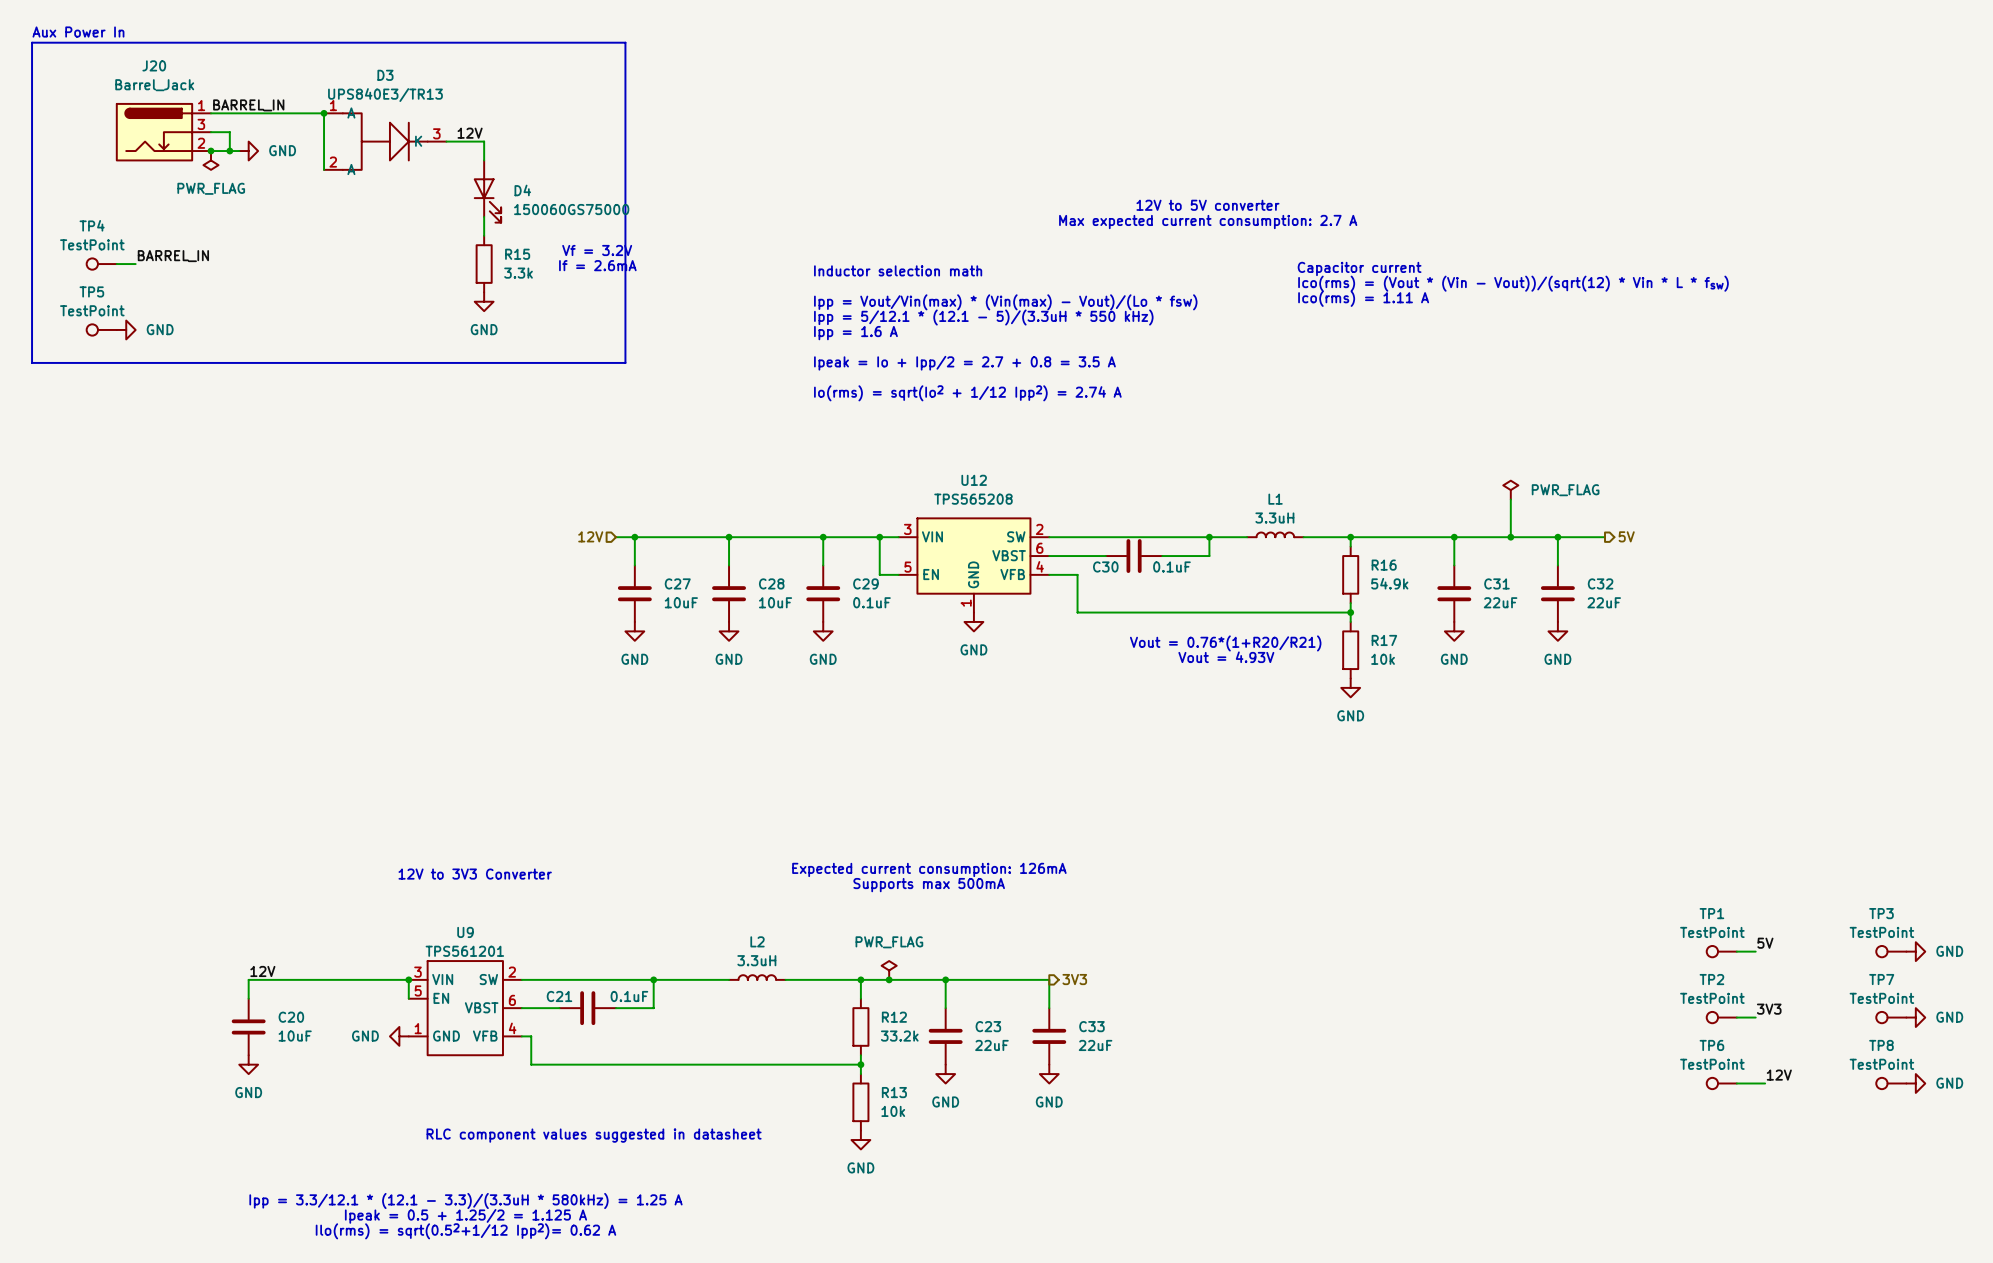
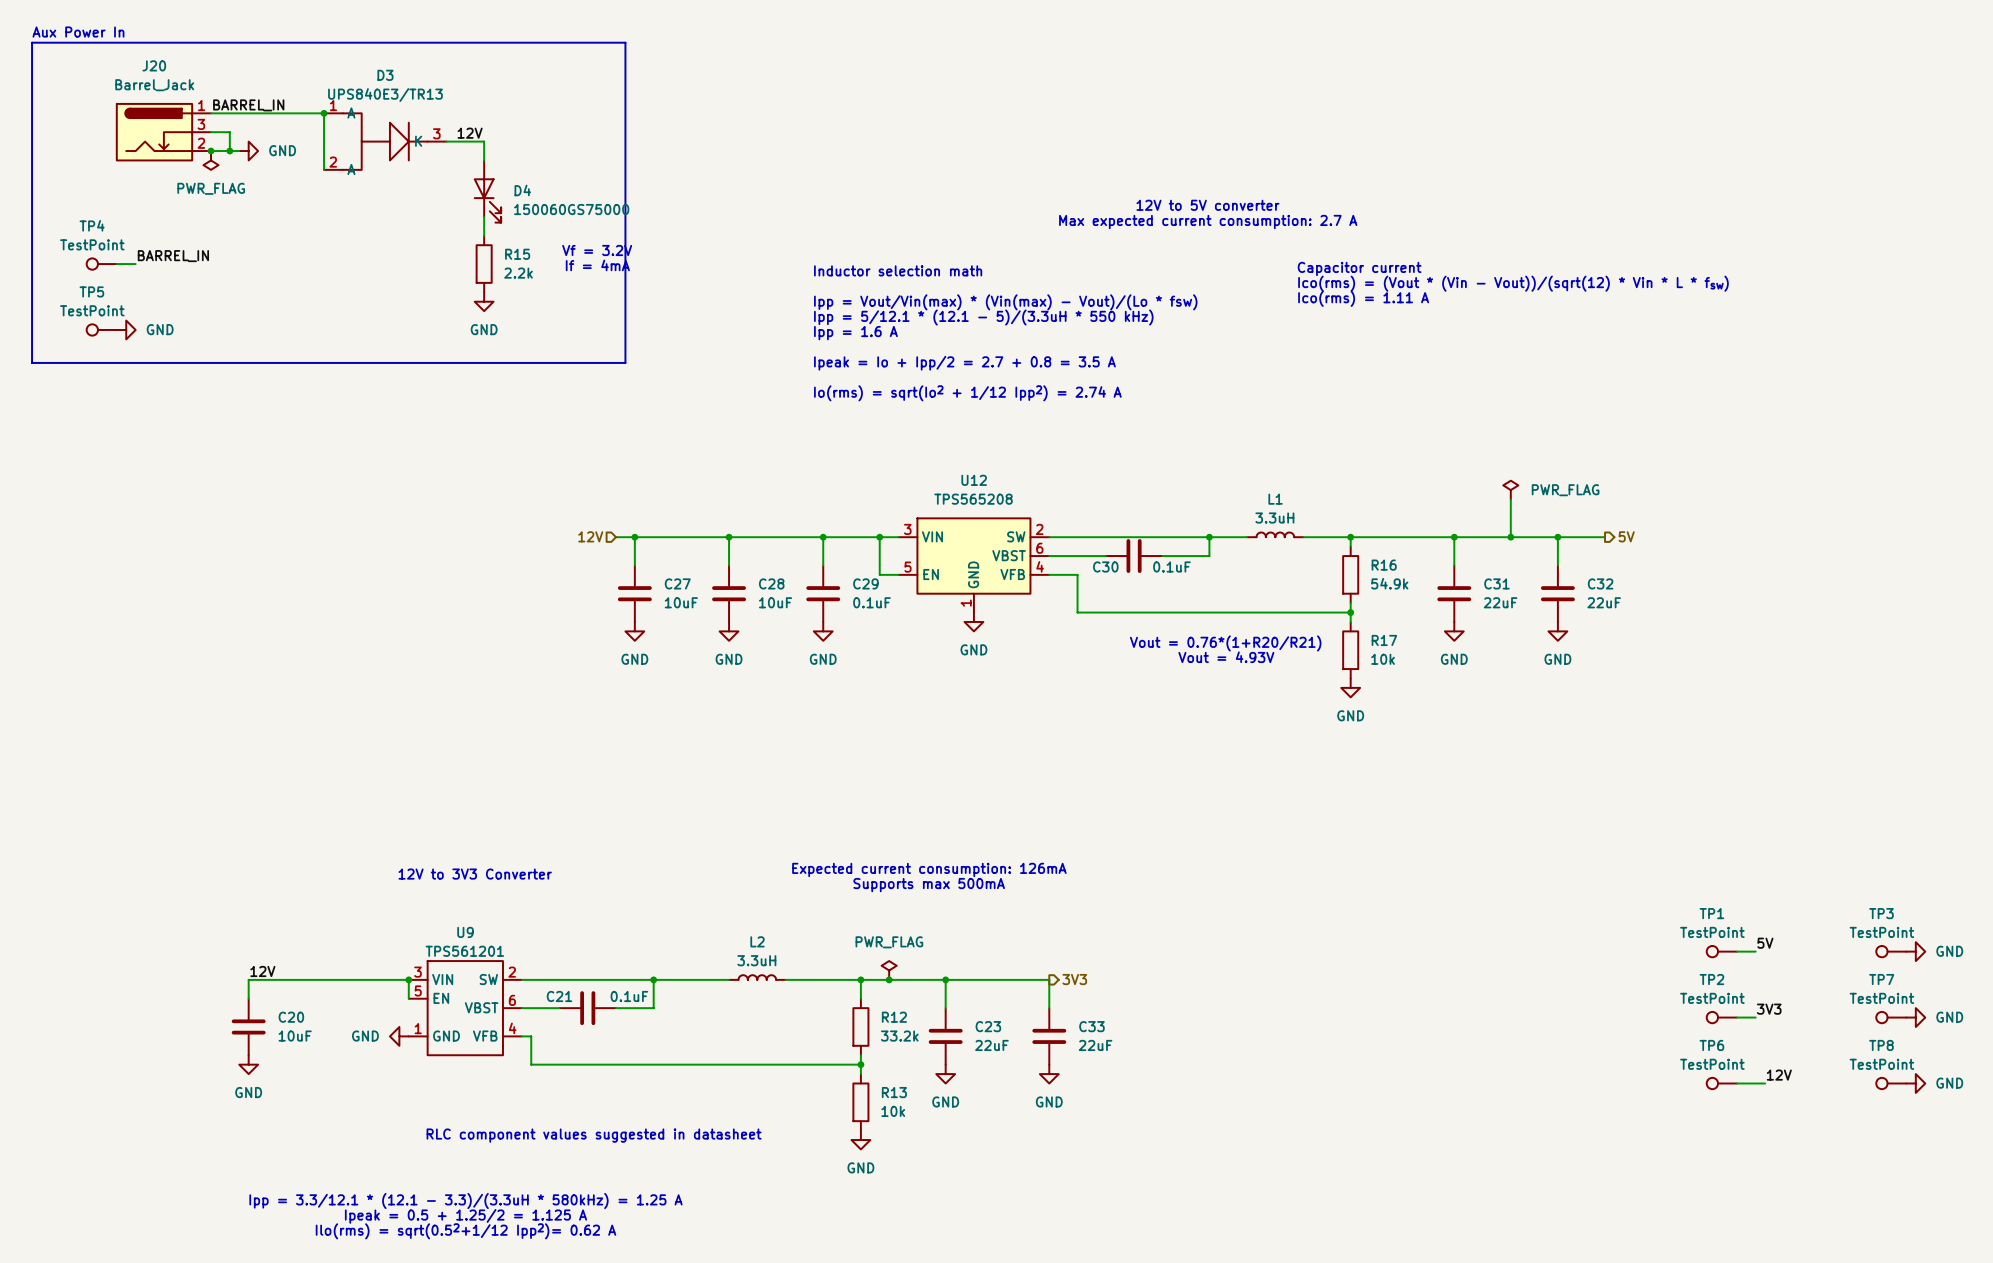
text: If = 2.6mA (597, 265) -> If = 4mA (597, 265)
R15 value: 3.3k (518, 273) -> 2.2k (518, 273)

